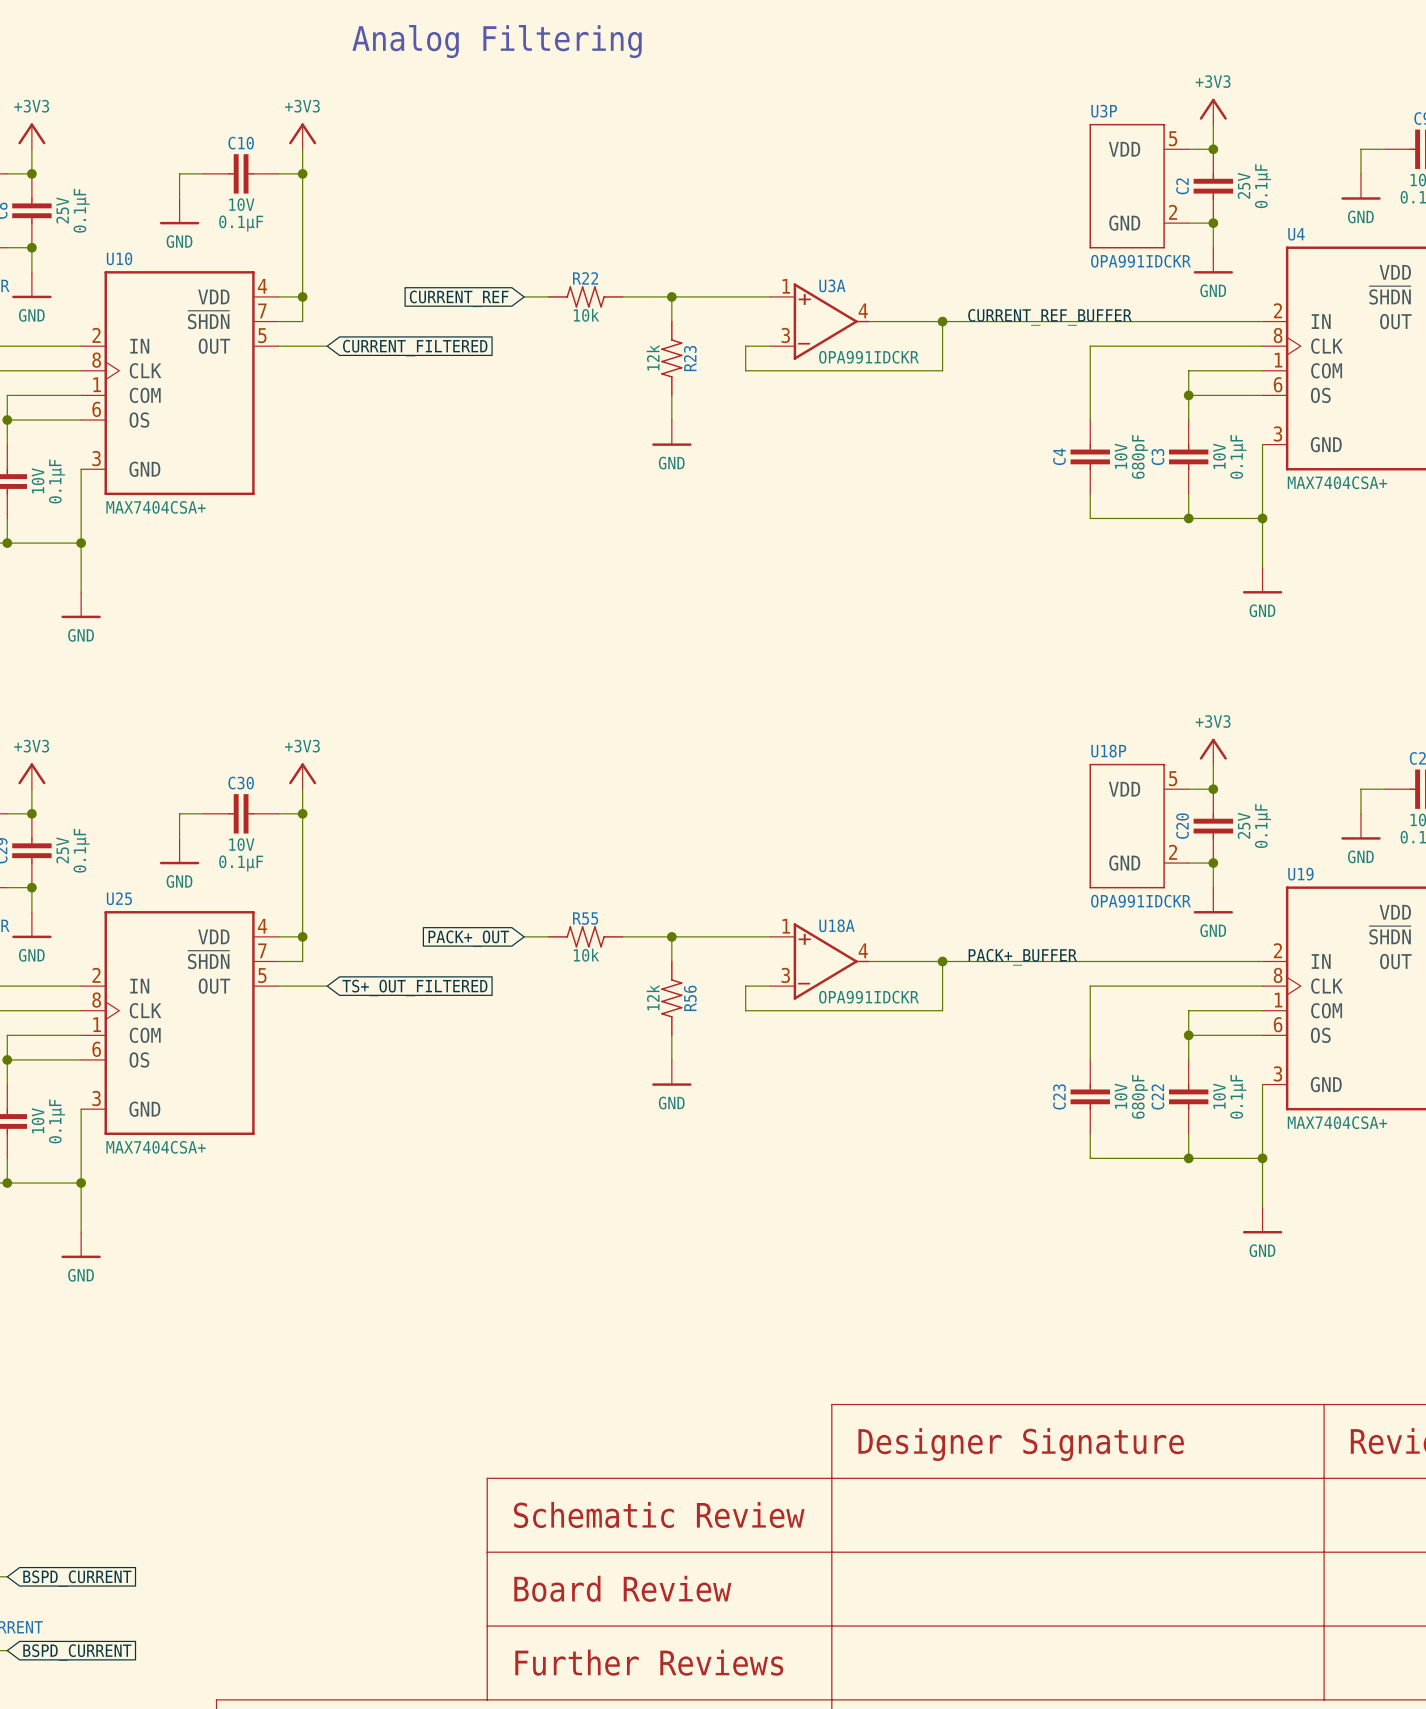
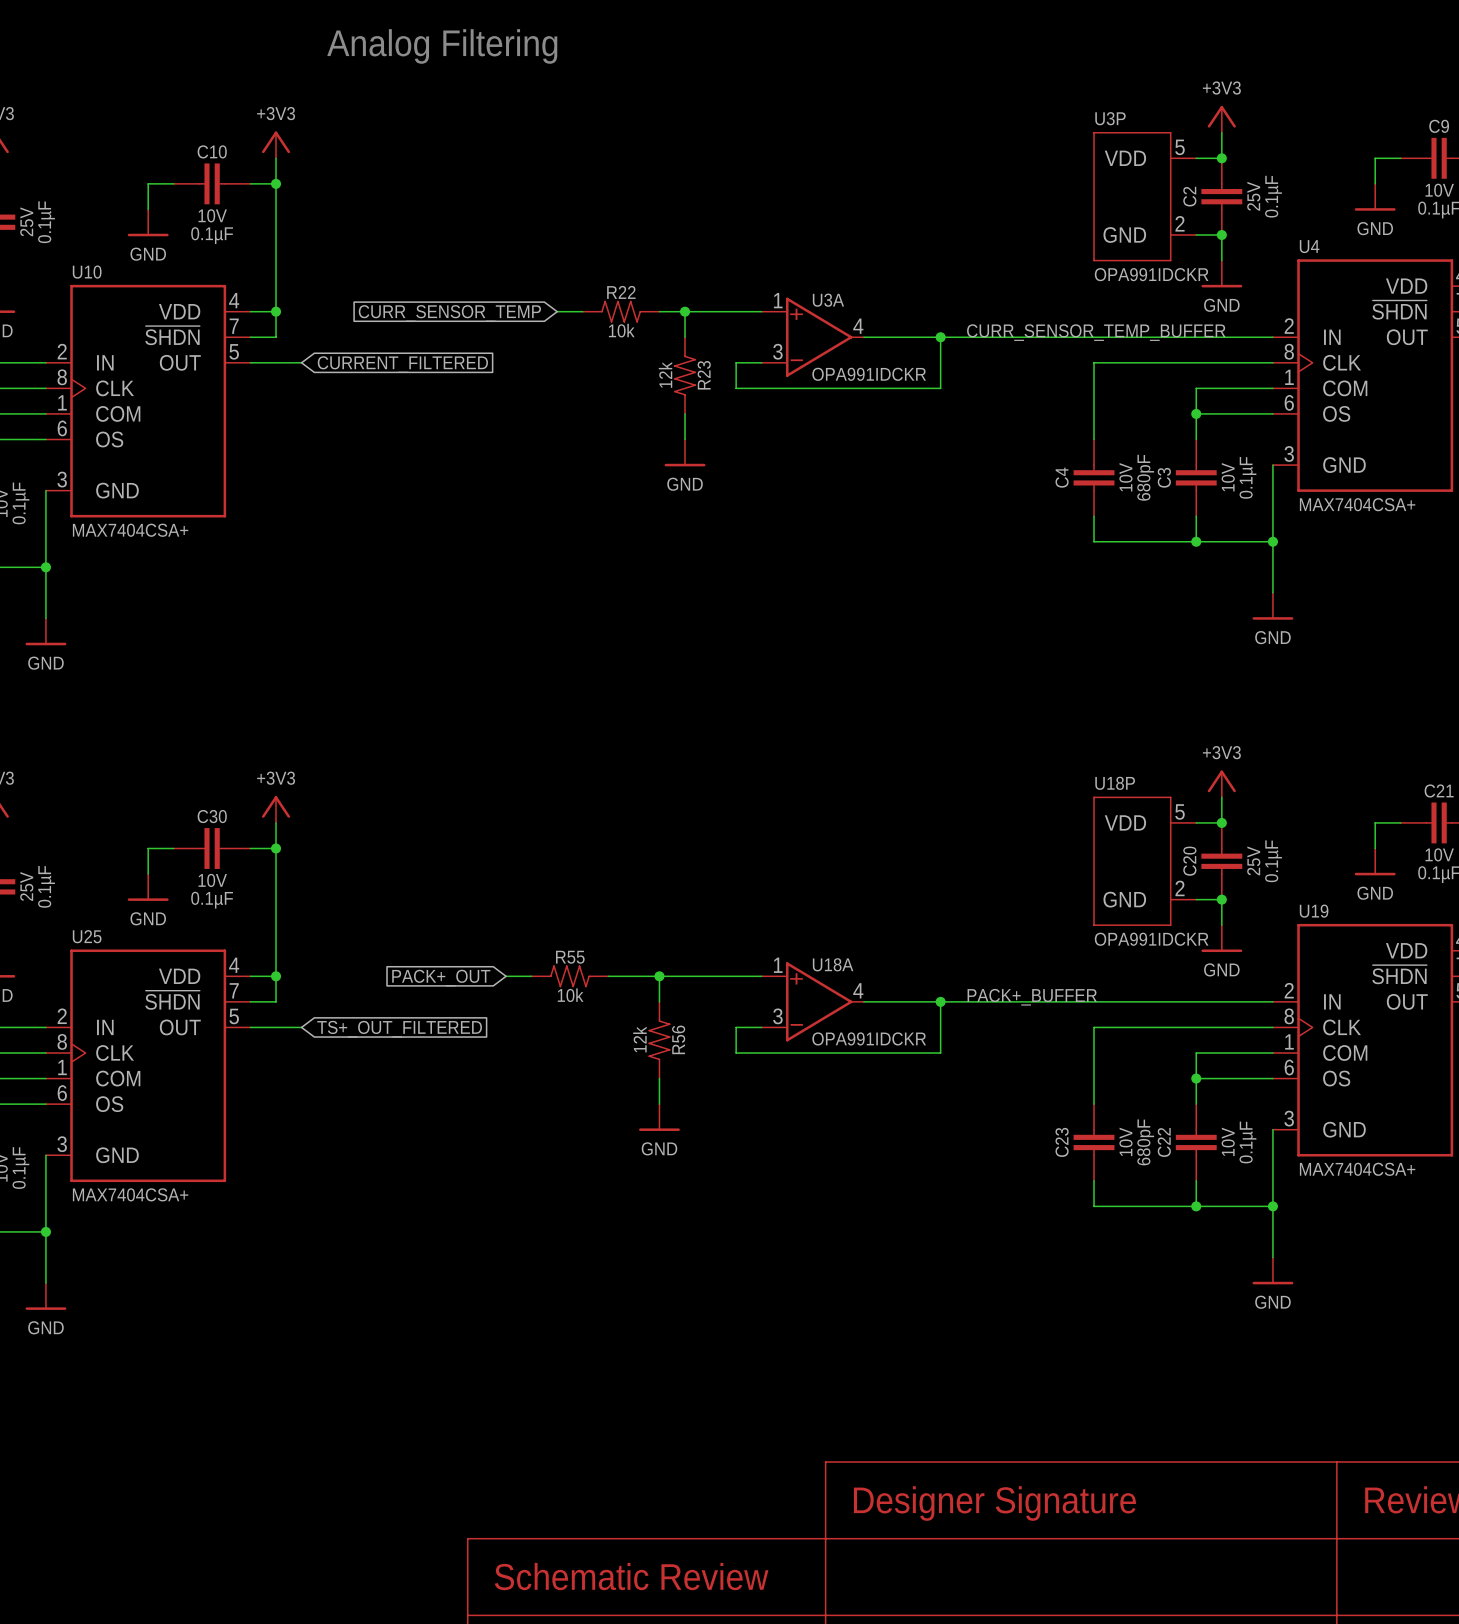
R22 position: (585, 296) -> (621, 311)
wire: (622, 296) (671, 296) (671, 321) -> none
junction position: (671, 296) -> (685, 311)
wire: none -> (685, 311) (685, 337)
global label: CURRENT_REF (459, 298) -> none
global label: none -> CURR_SENSOR_TEMP (449, 313)
label: CURRENT_REF_BUFFER (1050, 317) -> CURR_SENSOR_TEMP_BUFFER (1096, 332)
R23 position: (671, 358) -> (685, 375)
wire: (671, 395) (671, 420) -> (685, 413) (685, 439)
power symbol position: GND (671, 432) -> GND (685, 452)

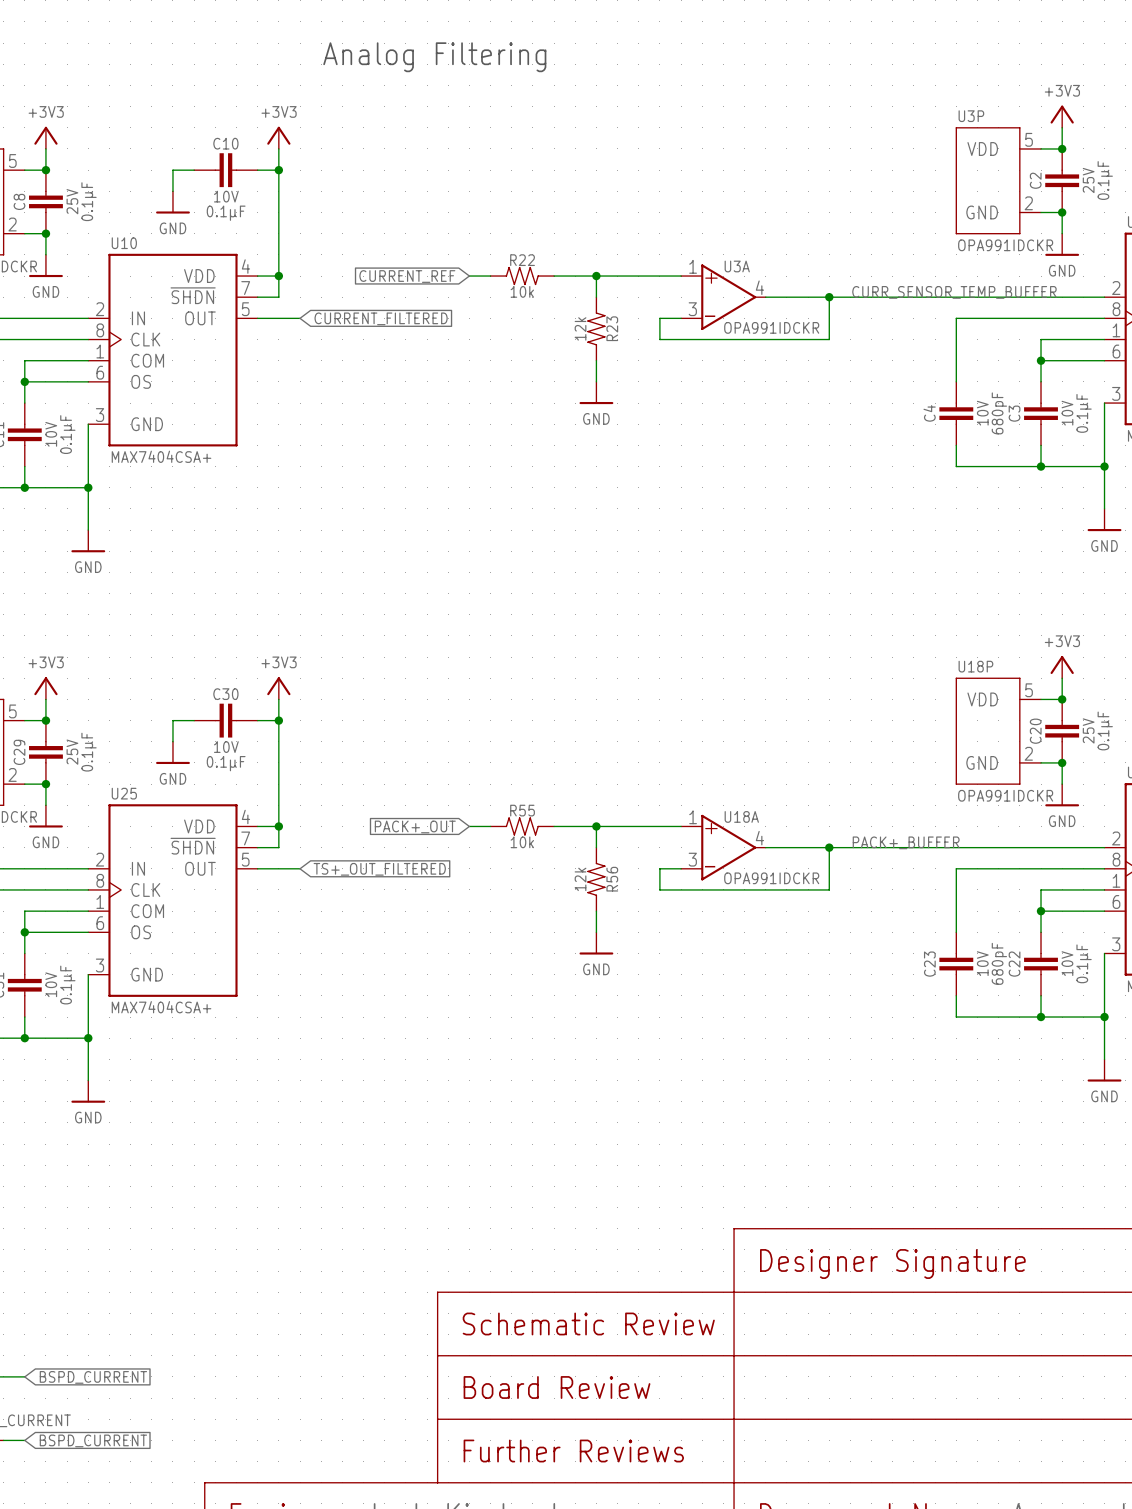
wire: (557, 311) (582, 311) -> (469, 276) (490, 276)
wire: none -> (554, 276) (596, 276) (596, 297)
R22 position: (621, 311) -> (522, 276)
wire: (685, 311) (685, 337) -> none
junction position: (685, 311) -> (596, 276)
global label: none -> CURRENT_REF (407, 276)
global label: CURR_SENSOR_TEMP (449, 313) -> none
R23 position: (685, 375) -> (596, 328)
wire: (685, 413) (685, 439) -> (596, 360) (596, 381)
power symbol position: GND (685, 452) -> GND (596, 392)

